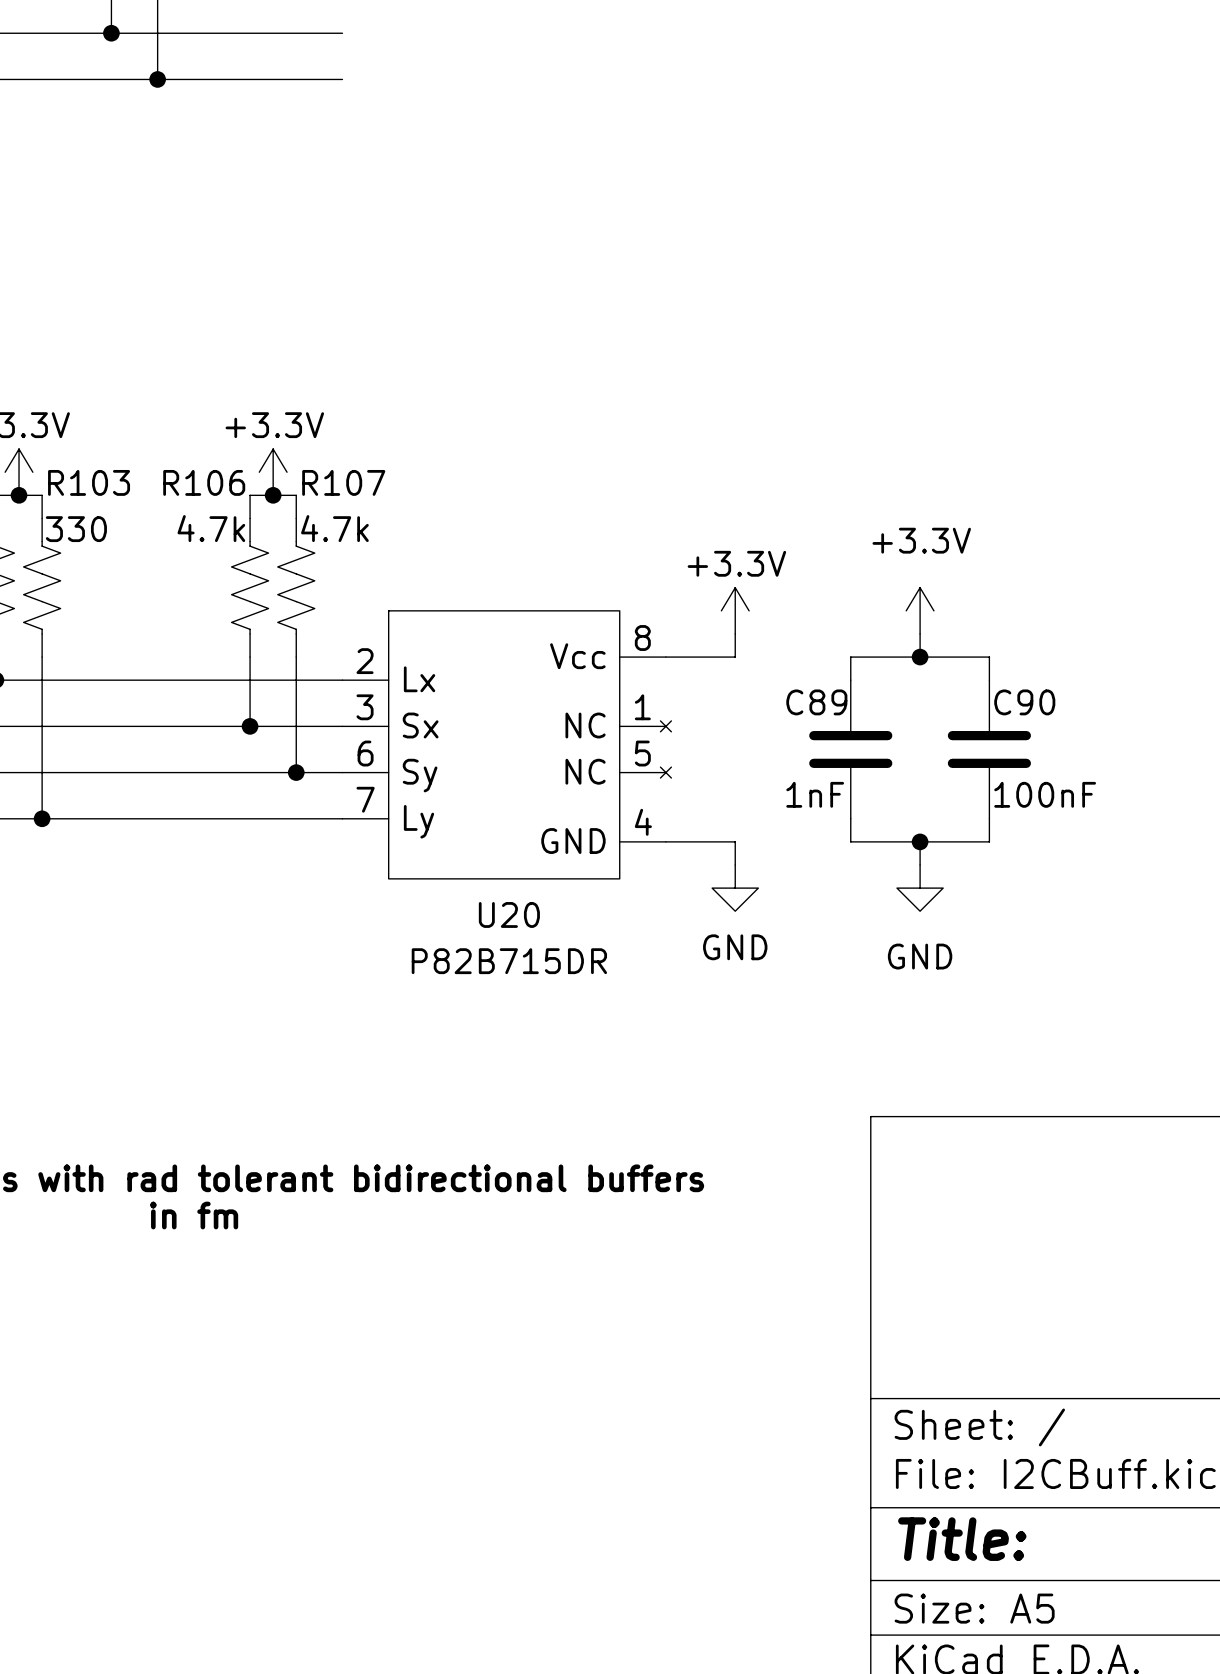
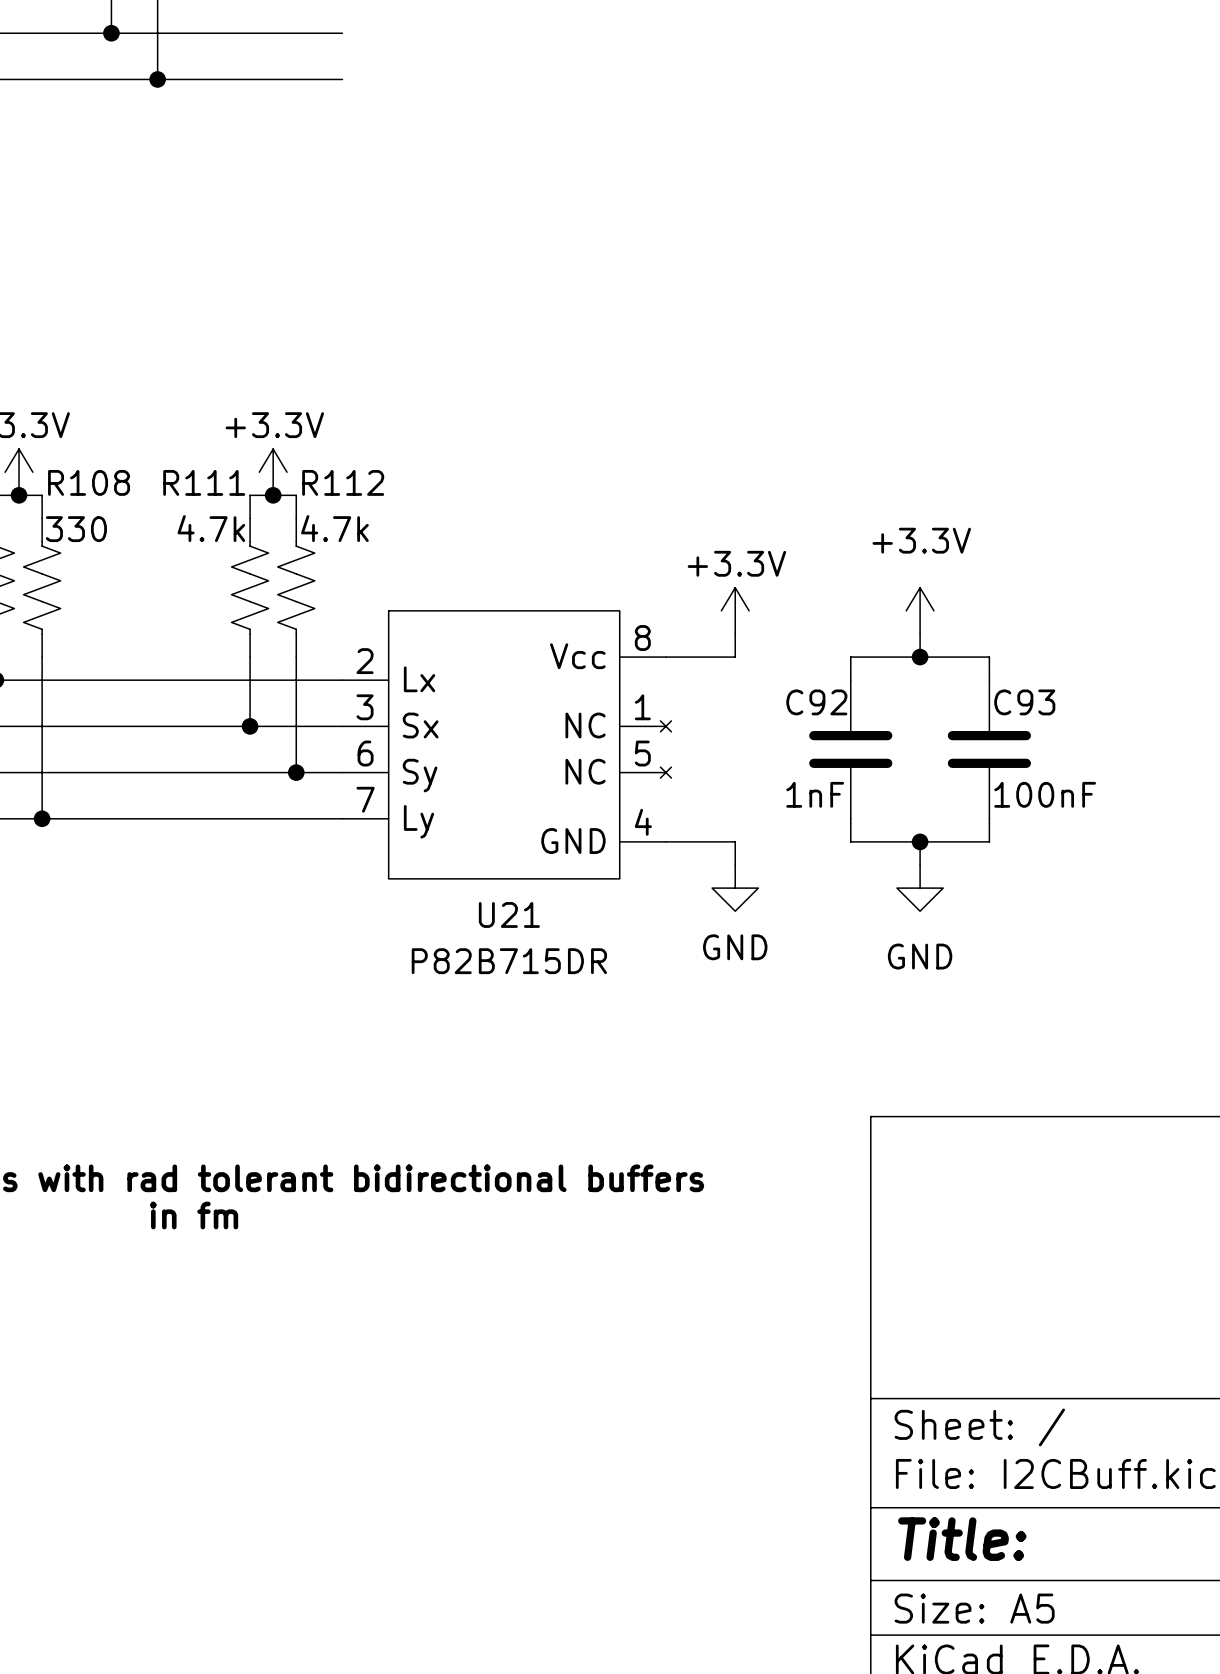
R103 name: R103 (89, 482) -> R108 (89, 482)
R106 name: R106 (204, 482) -> R111 (204, 482)
R107 name: R107 (343, 482) -> R112 (343, 482)
C89 name: C89 (816, 702) -> C92 (816, 702)
C90 name: C90 (1024, 702) -> C93 (1024, 702)
U20 name: U20 (509, 914) -> U21 (509, 914)

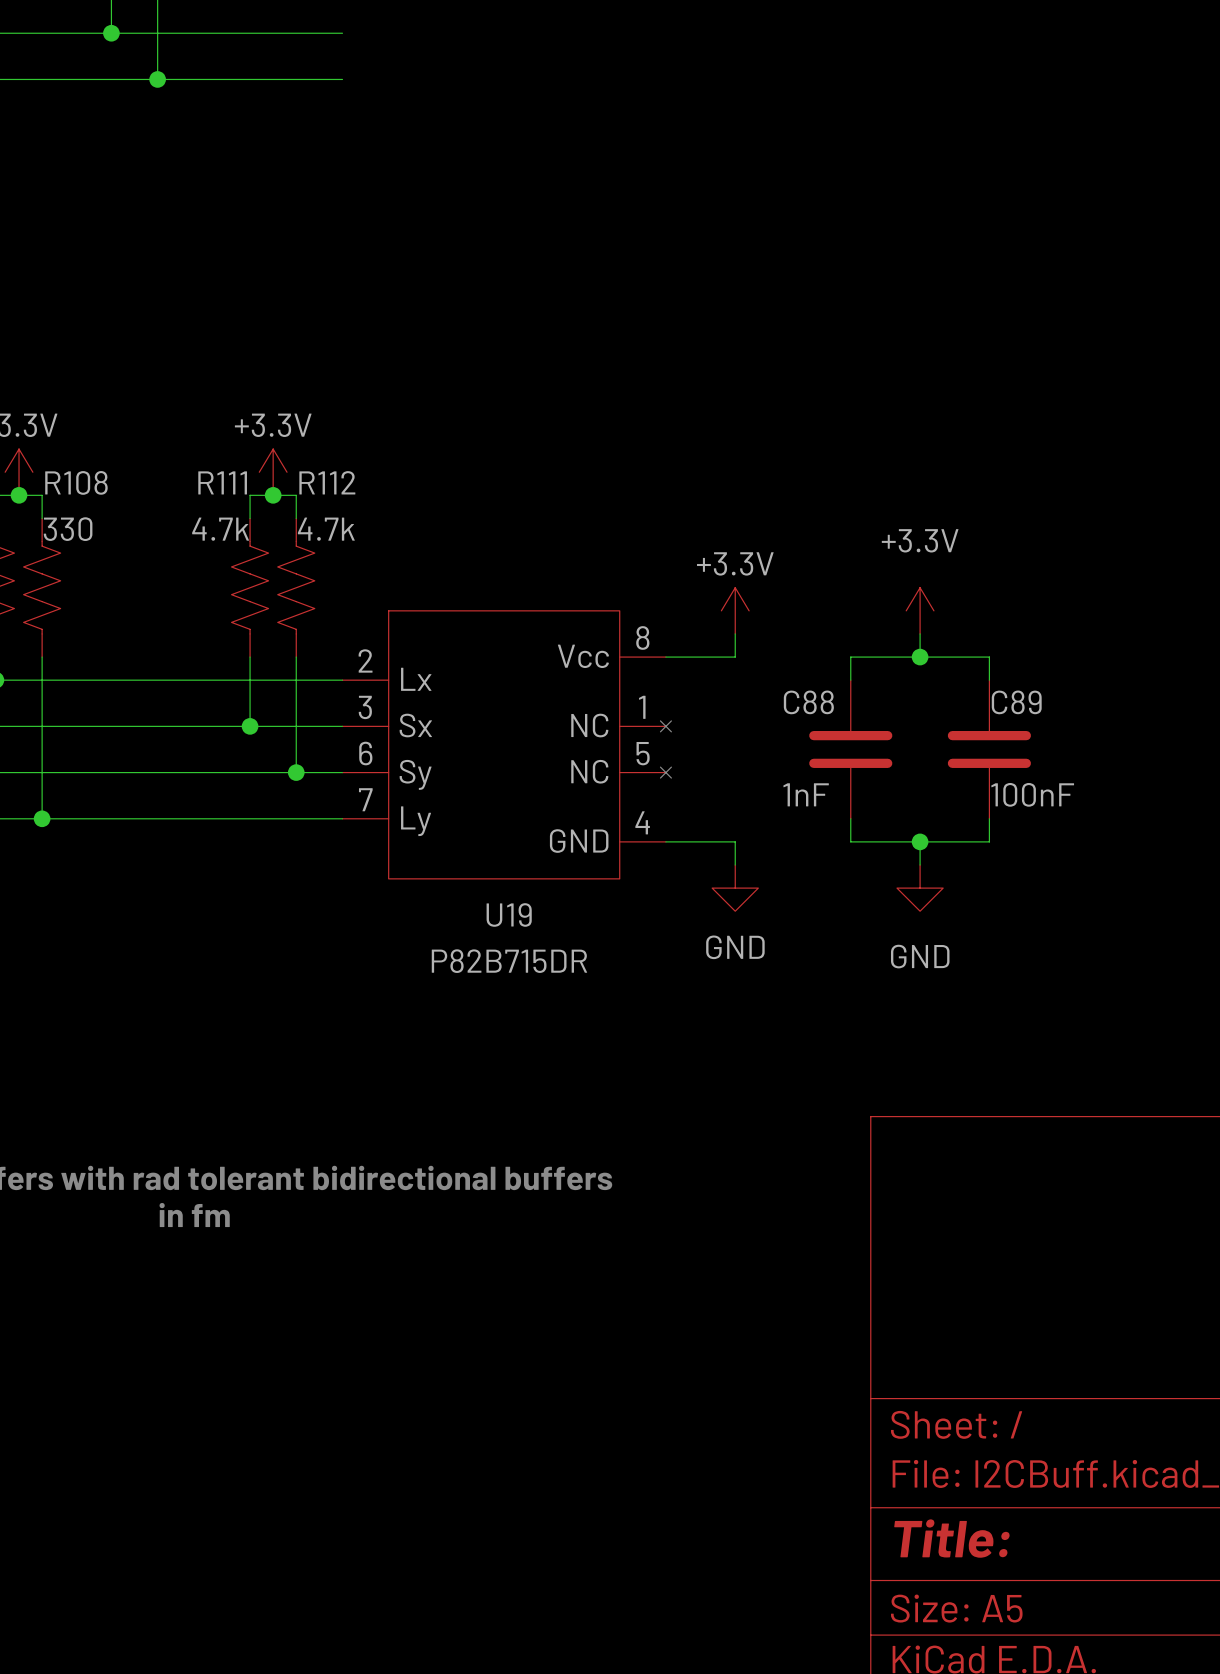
C92 name: C92 (816, 702) -> C88 (808, 702)
C93 name: C93 (1024, 702) -> C89 (1016, 702)
U21 name: U21 (509, 914) -> U19 (509, 914)

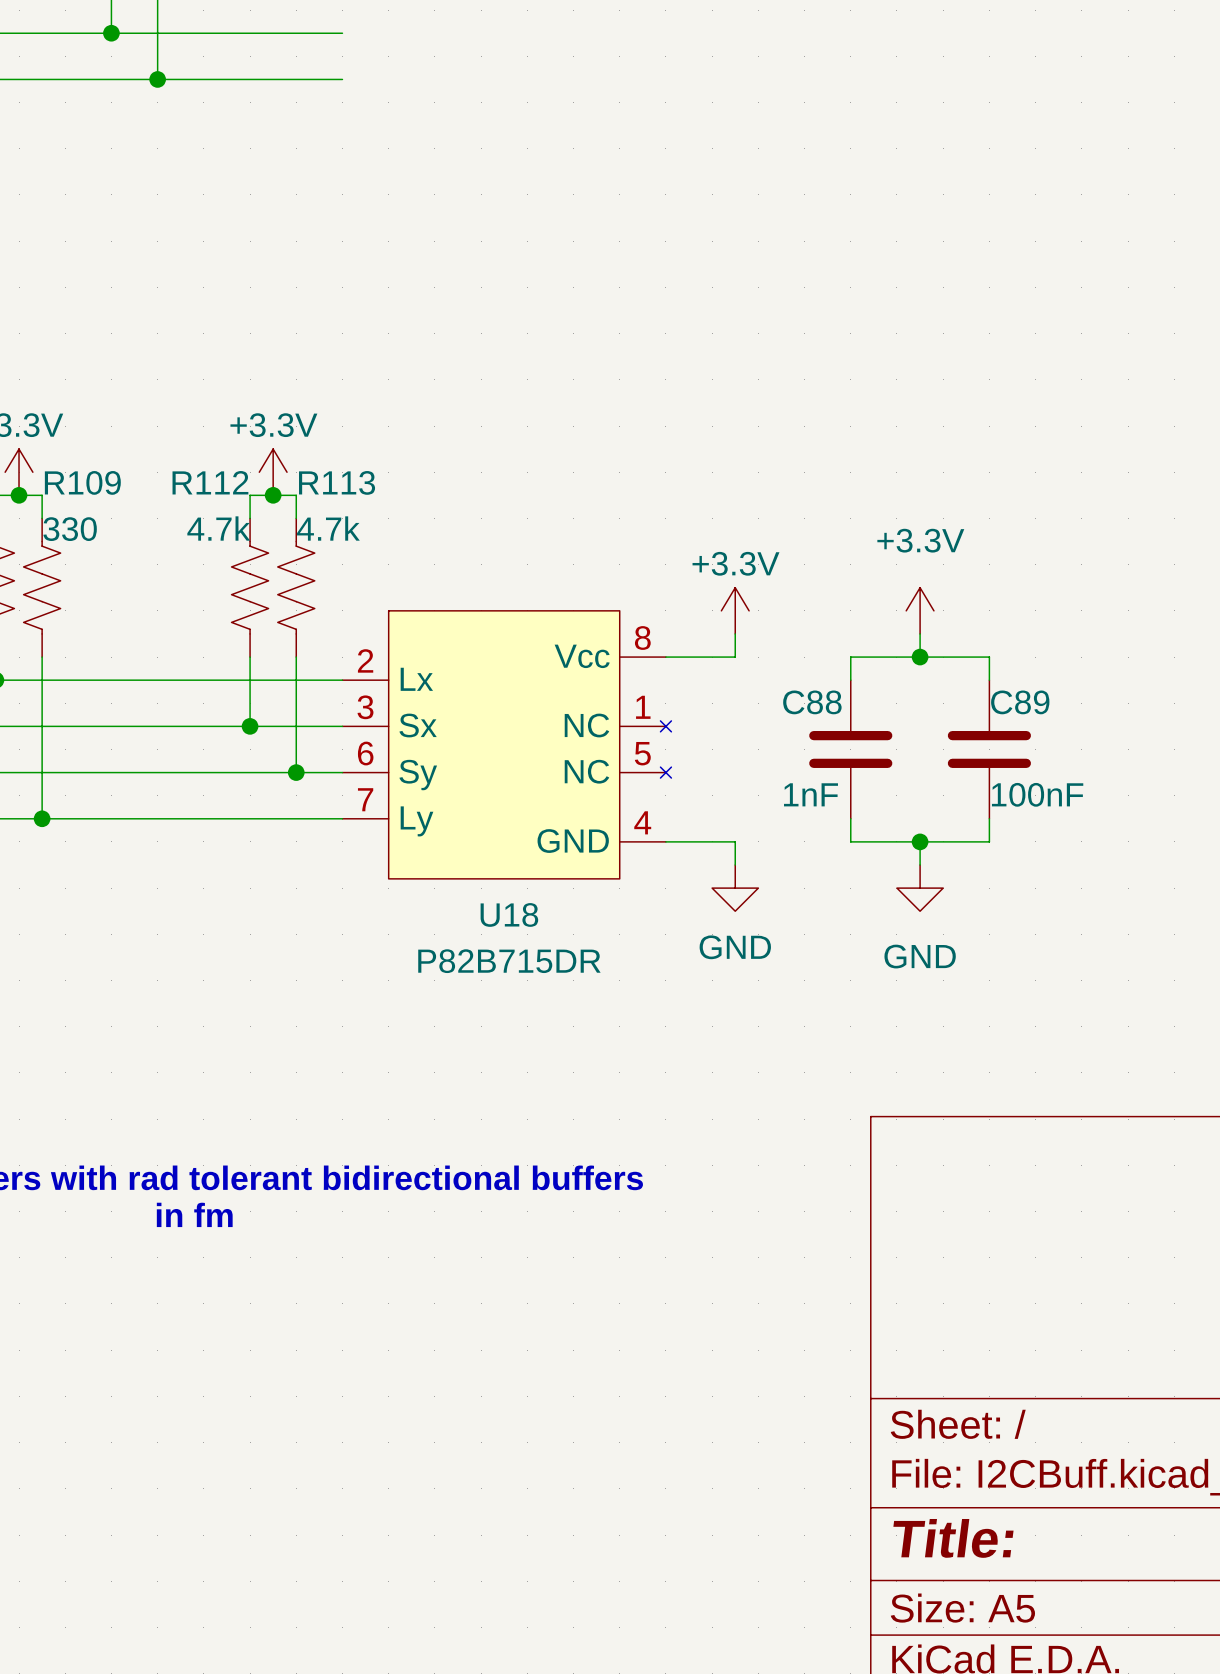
R108 name: R108 (76, 482) -> R109 (82, 482)
R111 name: R111 (222, 482) -> R112 (210, 482)
R112 name: R112 (327, 482) -> R113 (337, 482)
U19 name: U19 (509, 914) -> U18 (509, 914)

